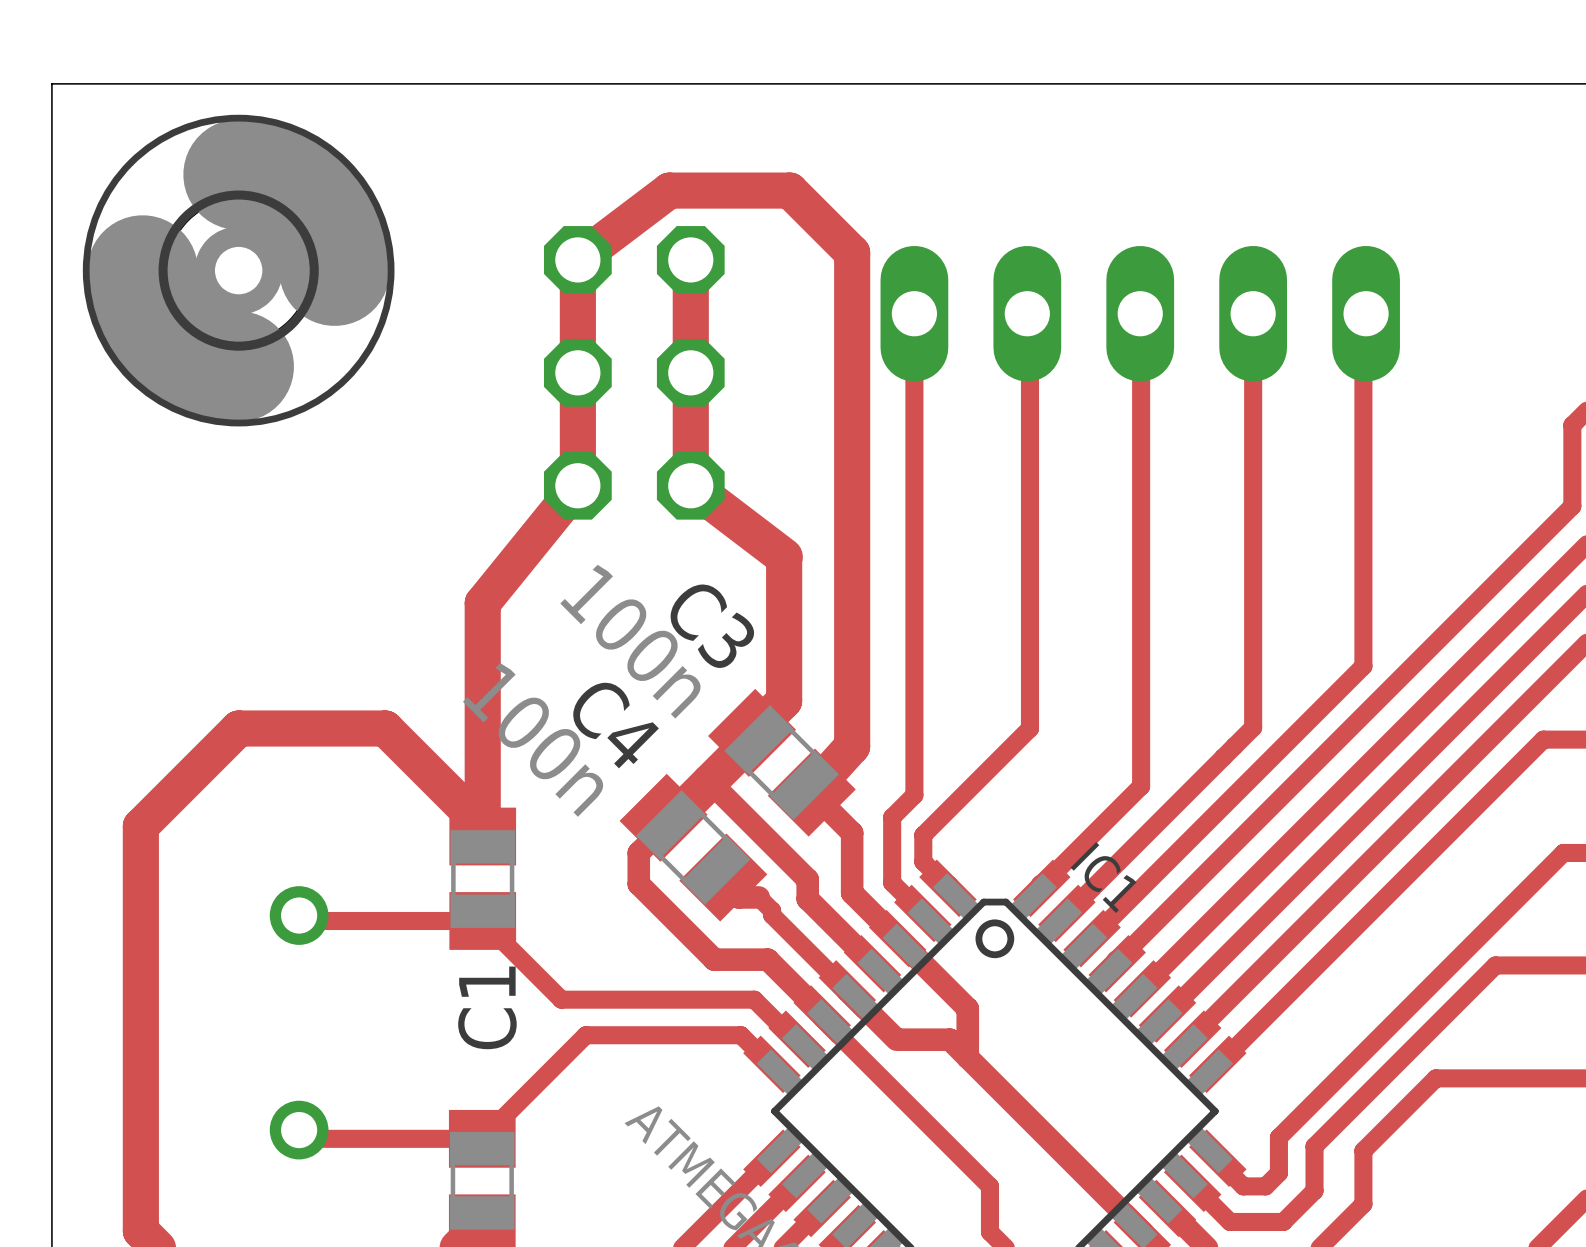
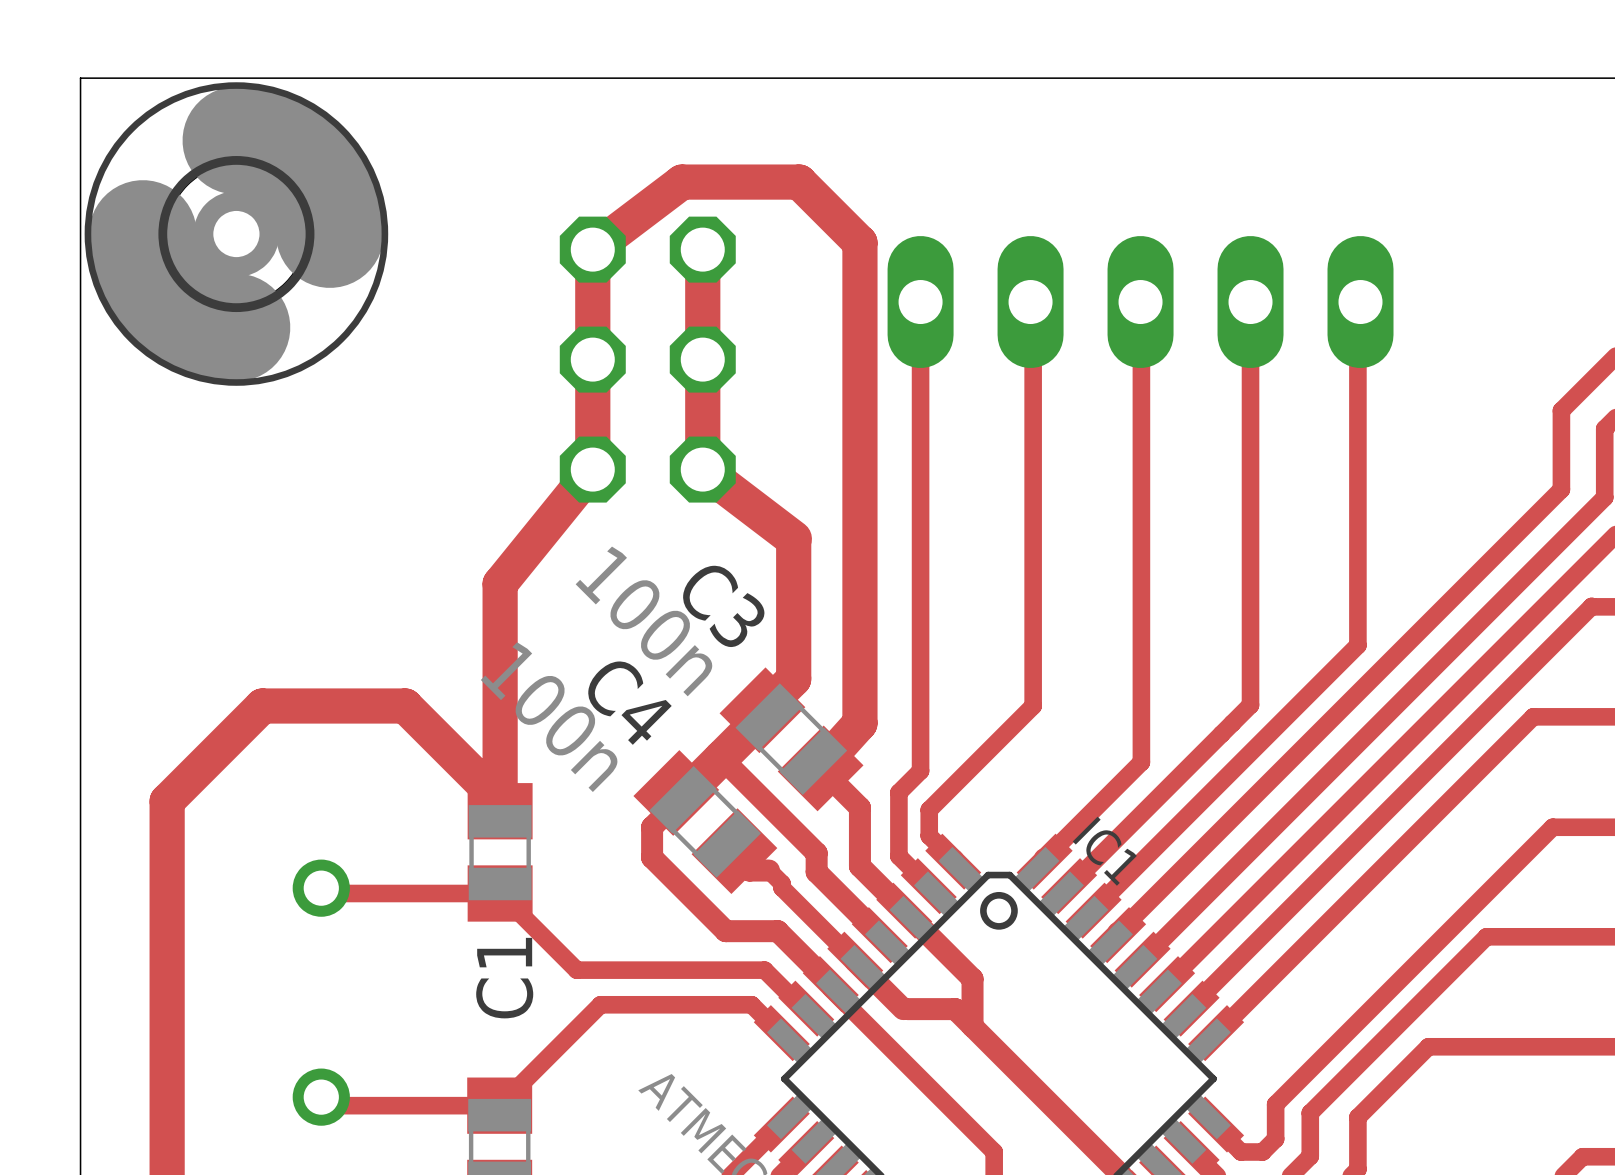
part position: (238, 270) -> (236, 234)

